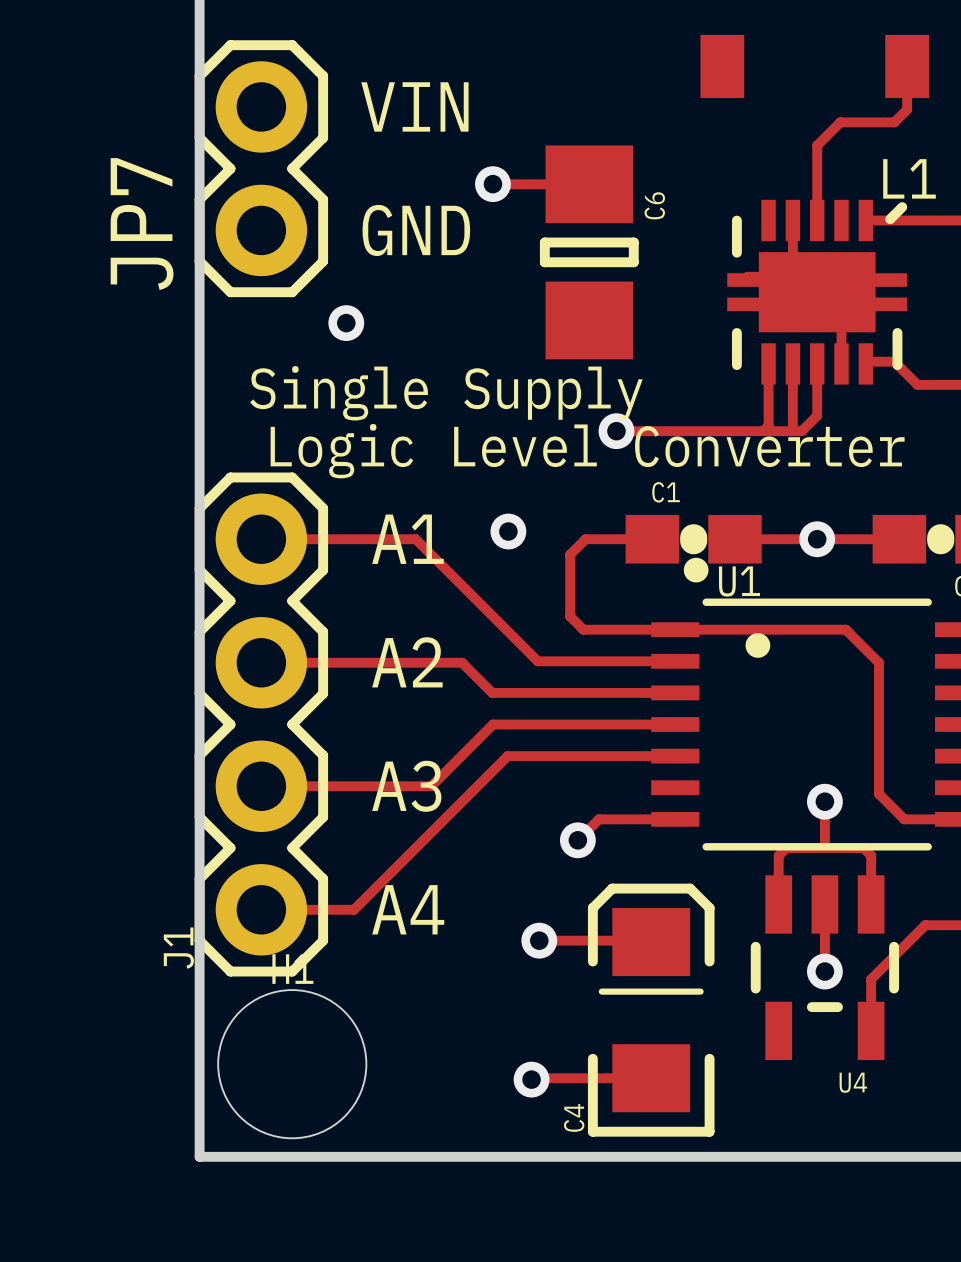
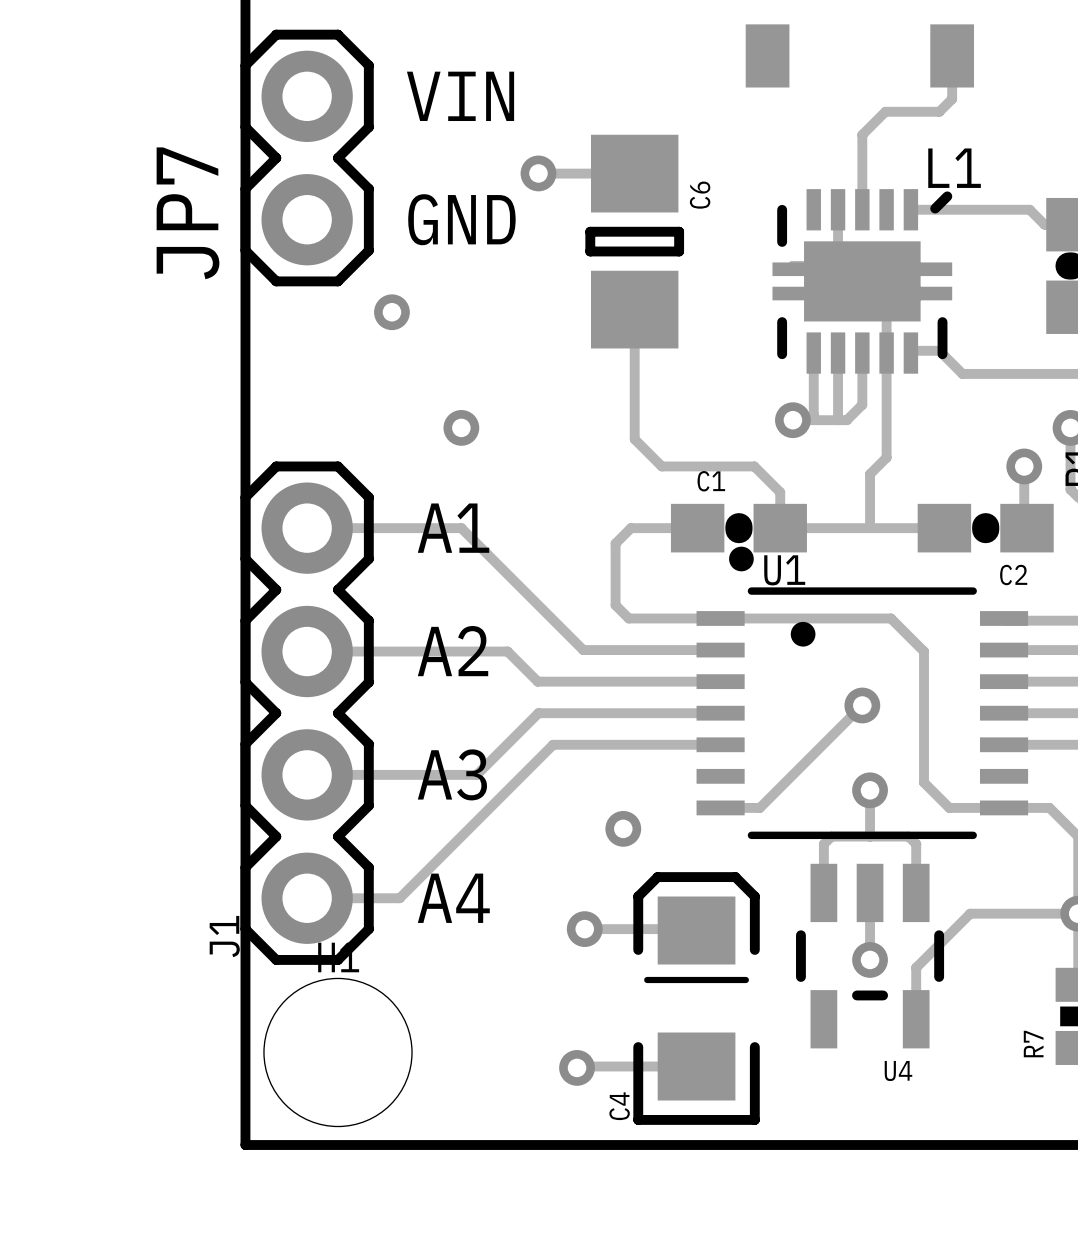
track: none -> (634, 309) (634, 439) (661, 466) (754, 466) (780, 492) (780, 528)
track: none -> (886, 353) (886, 457) (870, 474) (870, 528)
text: Single Supply (446, 393) -> none
track: (616, 431) (747, 431) -> none
via: (616, 431) -> none
via: none -> (792, 420)
via: none -> (461, 427)
text: Logic Level Converter (587, 451) -> none
via: (508, 531) -> none
via: (817, 539) -> none
via: none -> (862, 705)
track: (675, 819) (598, 819) (577, 840) -> (720, 807) (759, 807) (862, 705)

